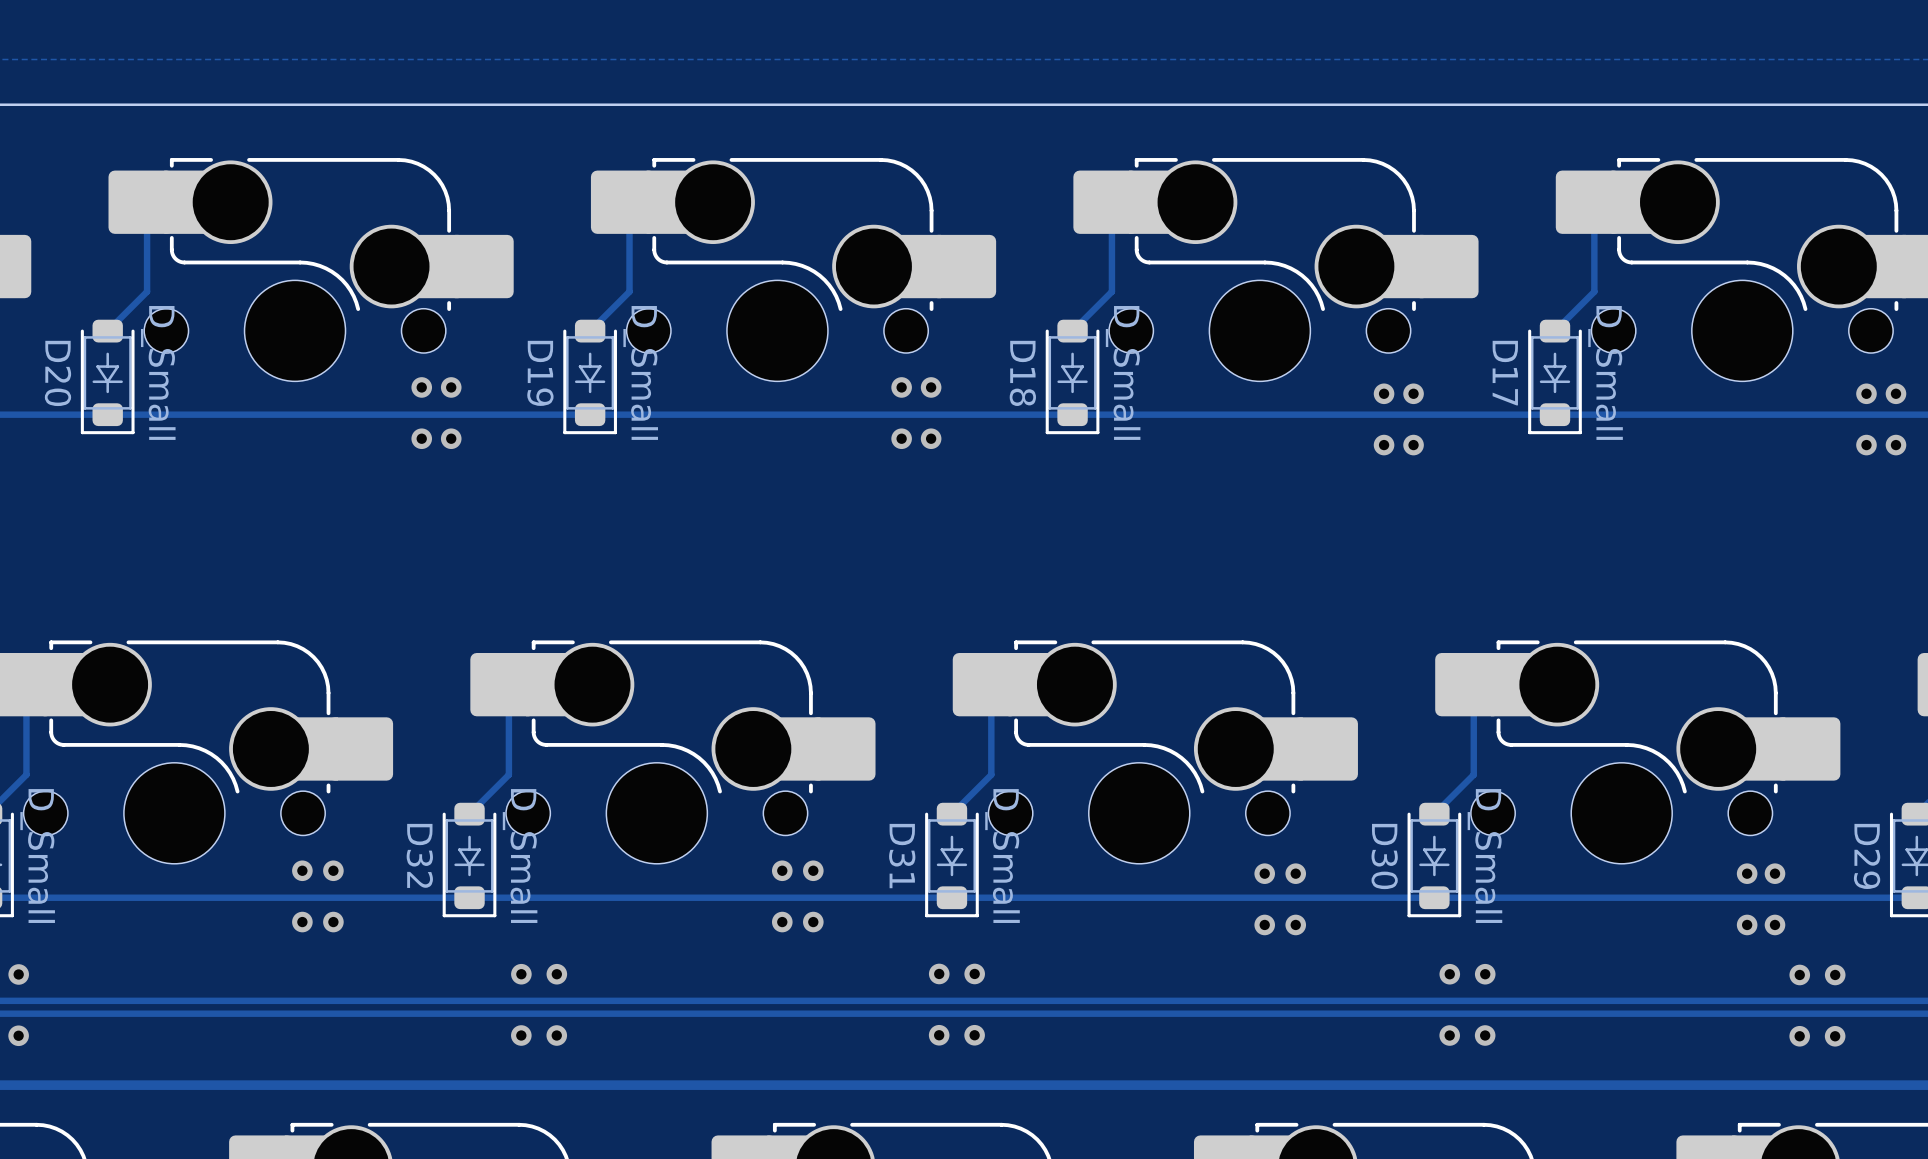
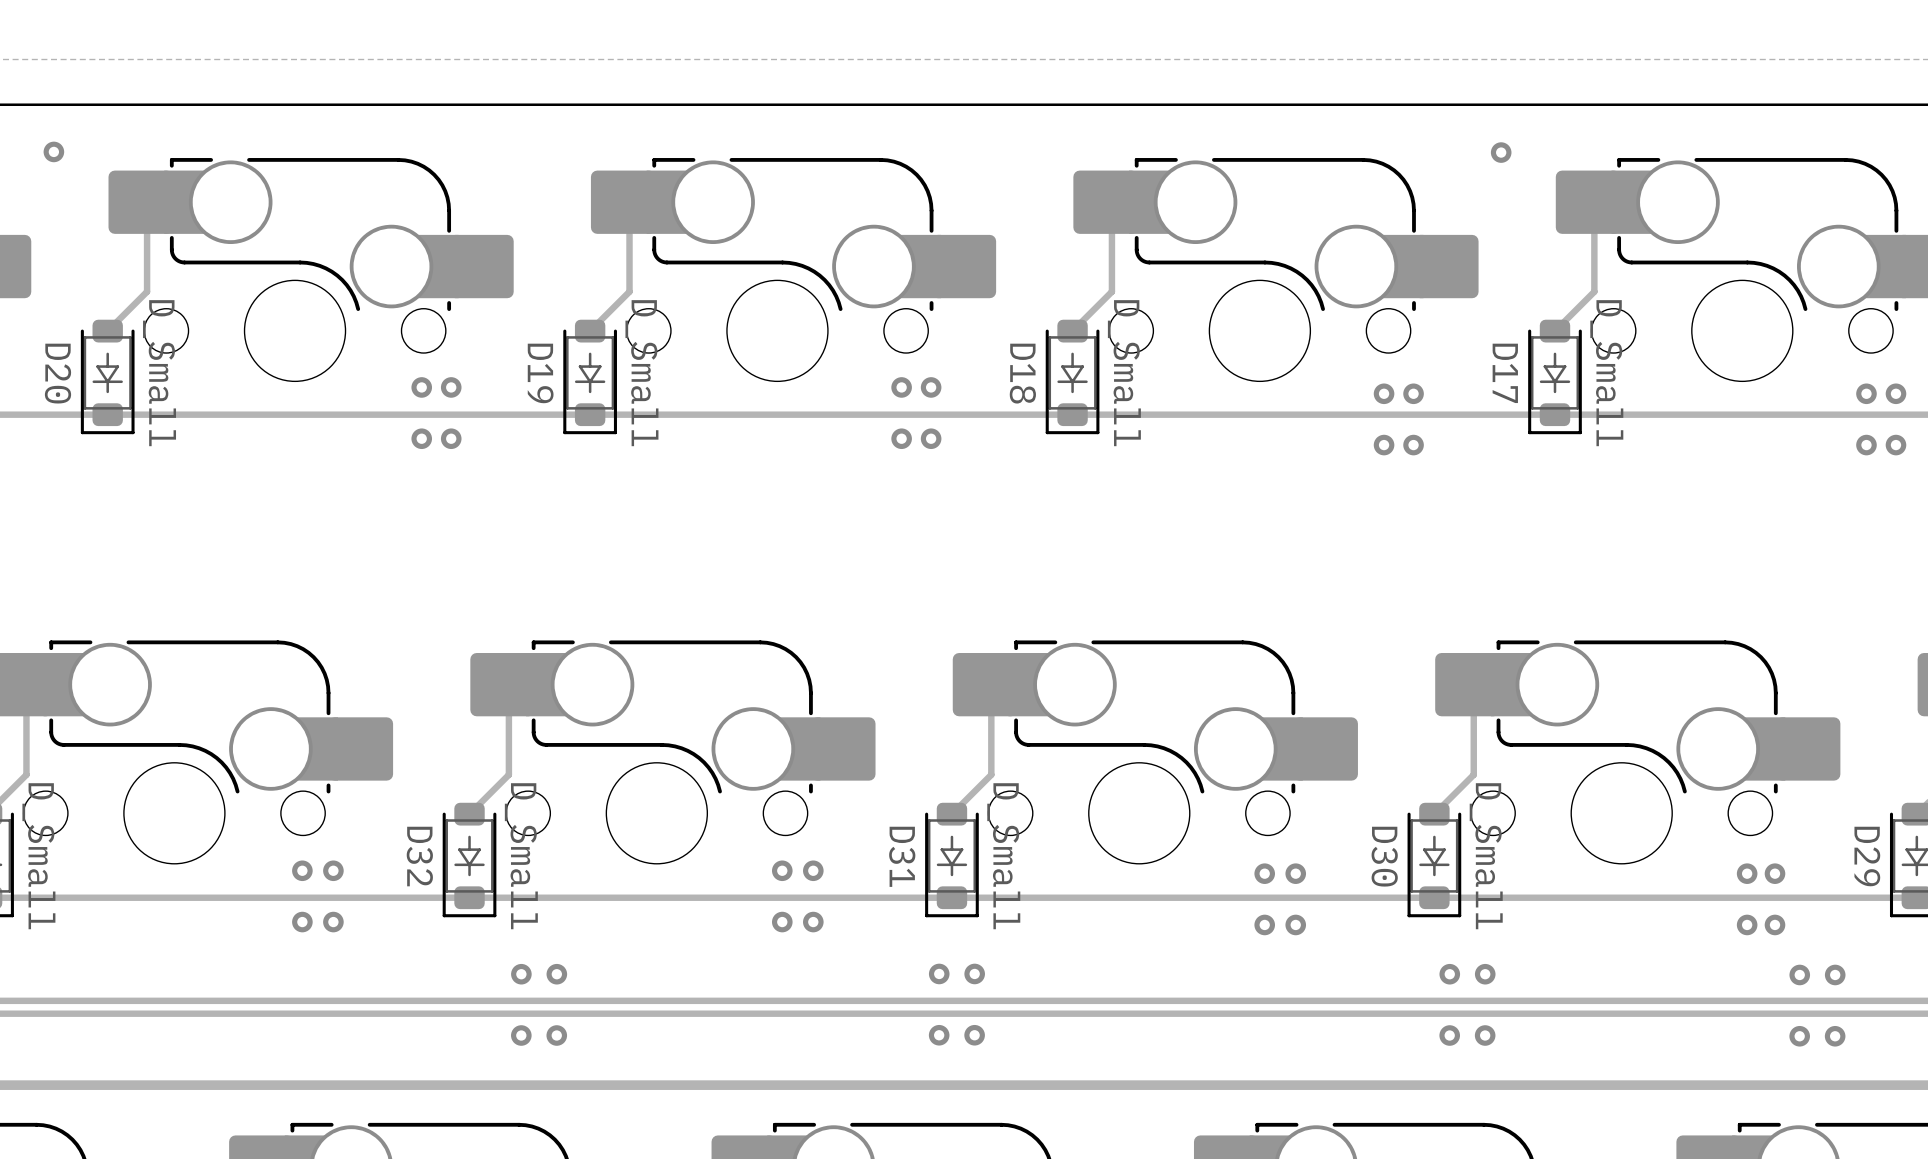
via: none -> (53, 151)
via: none -> (1501, 152)
via: (18, 974) -> none
via: (18, 1035) -> none

